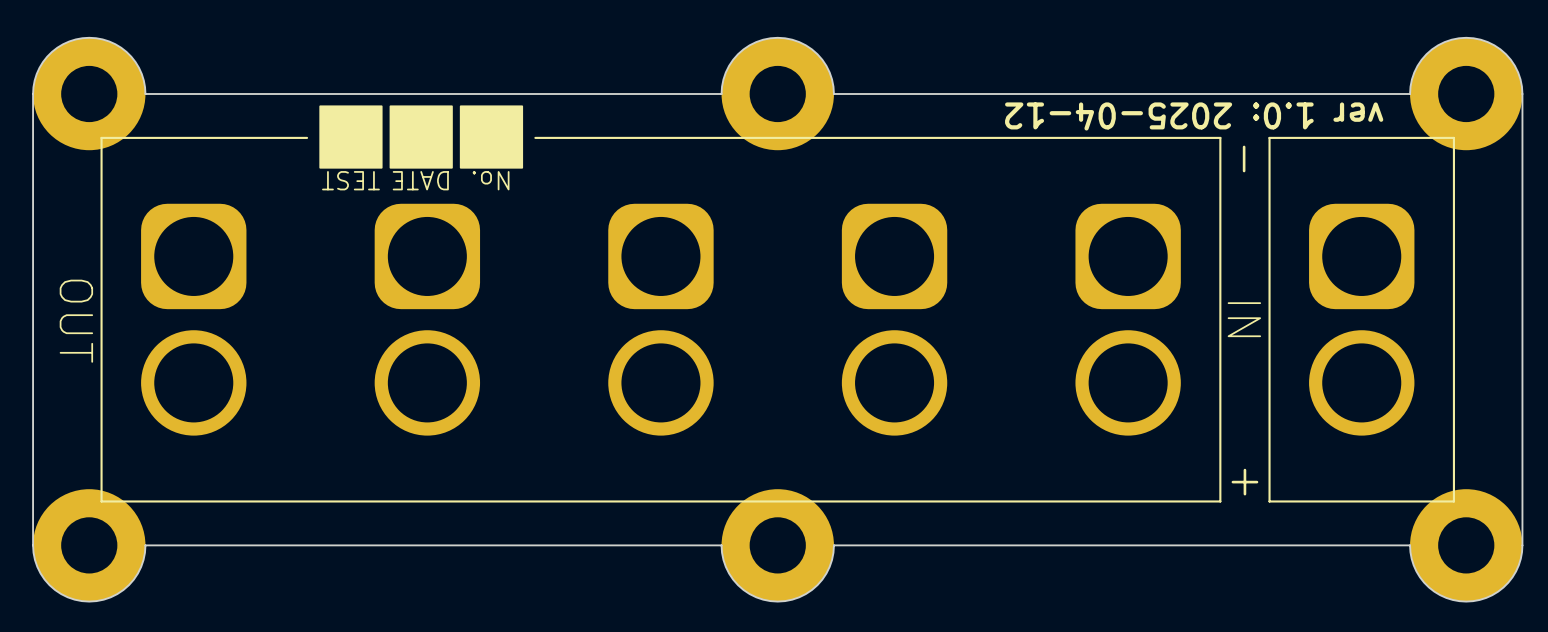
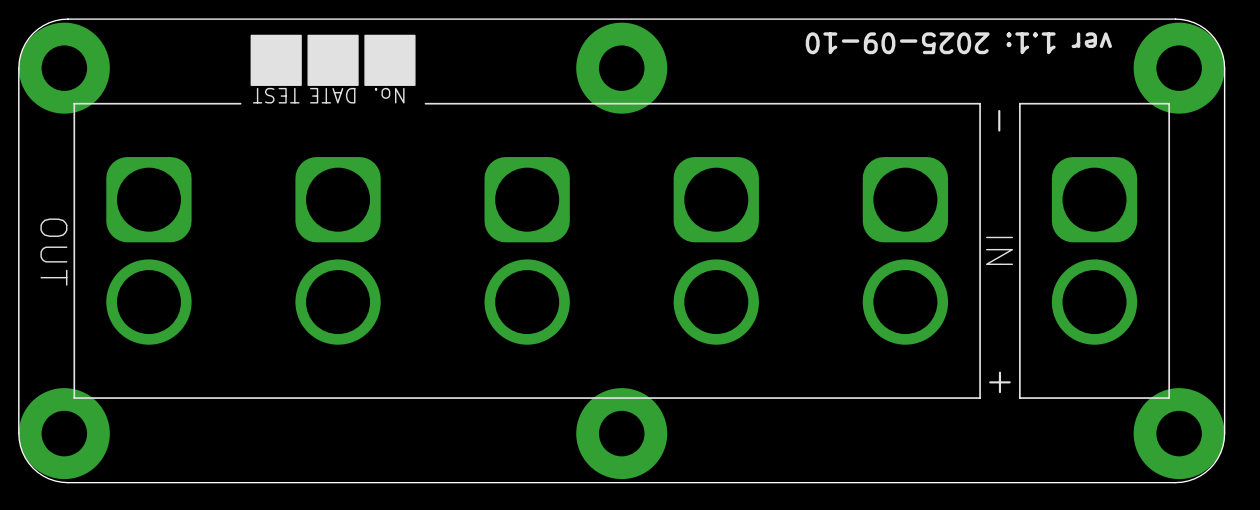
text: none -> ver 1.1: 2025-09-10 (958, 43)
board edge: (1522, 94) (1518, 72) (1505, 54) (1487, 42) (1466, 37) (1444, 42) (1426, 54) (1414, 72) (1410, 94) (833, 94) (829, 72) (817, 54) (799, 42) (777, 37) (756, 42) (738, 54) (725, 72) (721, 94) (145, 94) (141, 74) (131, 56) (121, 47) (109, 41) (89, 37) (69, 41) (51, 51) (39, 67) (34, 80) (33, 94) -> (1224, 68) (1220, 49) (1210, 33) (1194, 22) (1175, 19) (67, 19) (49, 22) (33, 33) (22, 49) (18, 68)
text: ver 1.0: 2025-04-12 (1194, 116) -> none
drawing position: (421, 137) -> (333, 60)
board edge: (1522, 545) (1518, 565) (1508, 582) (1498, 591) (1486, 597) (1466, 601) (1446, 597) (1434, 591) (1424, 582) (1413, 565) (1410, 545) (833, 545) (829, 566) (817, 585) (799, 597) (777, 601) (756, 597) (738, 585) (725, 566) (721, 545) (145, 545) (143, 559) (137, 573) (123, 589) (103, 599) (81, 601) (67, 597) (49, 585) (37, 566) (33, 545) -> (1224, 433) (1220, 452) (1210, 468) (1194, 478) (1175, 482) (67, 482) (49, 478) (33, 468) (22, 452) (18, 433)

